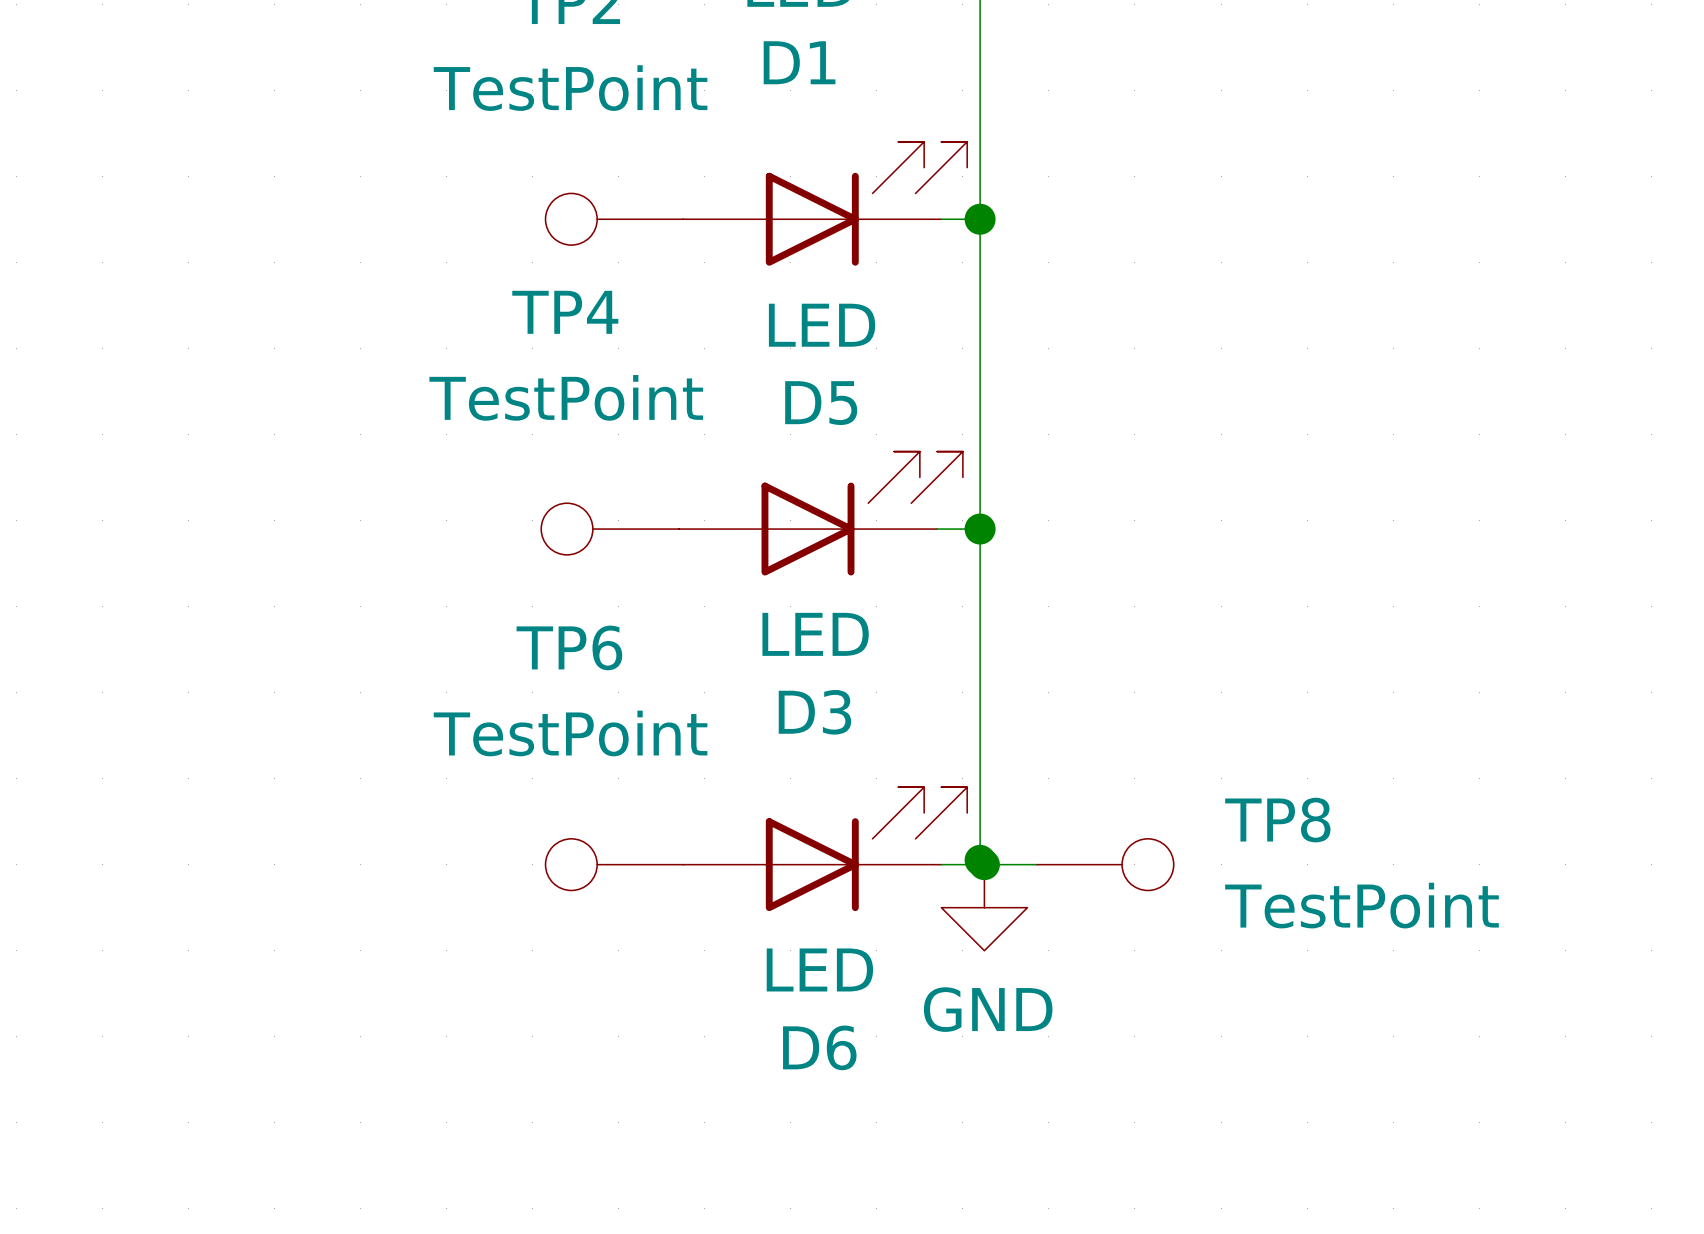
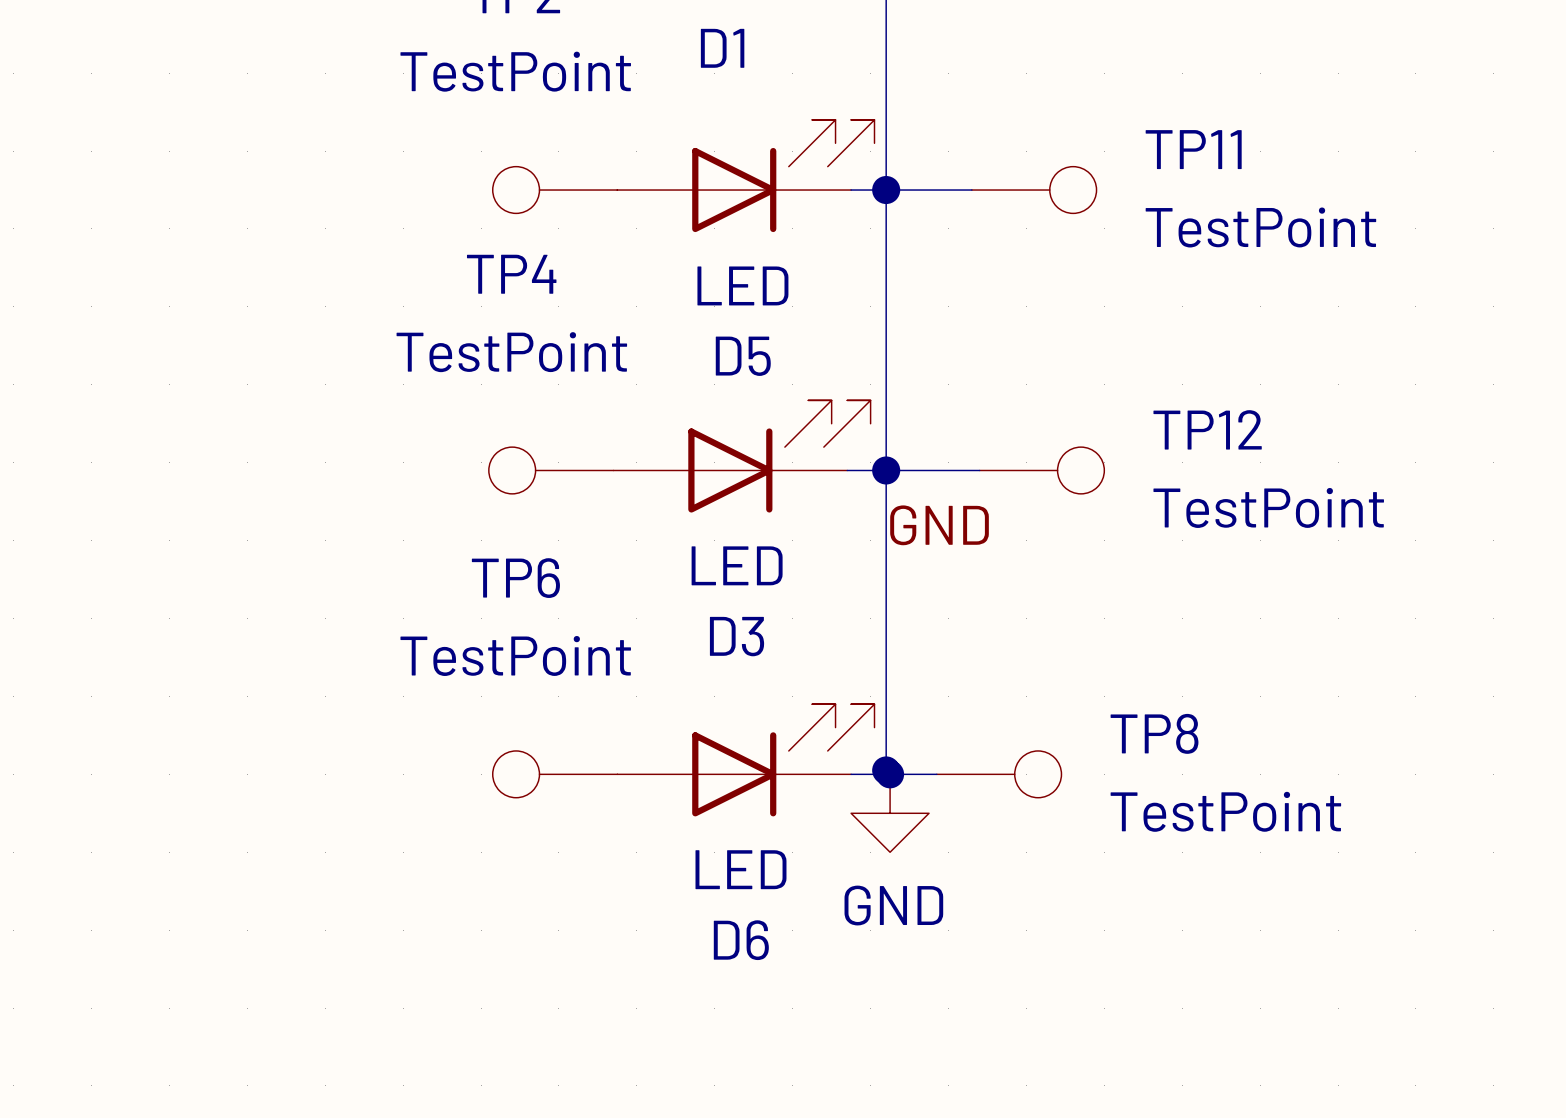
wire: none -> (886, 190) (971, 190)
TP11: none -> TestPoint (1034, 190)
wire: none -> (886, 470) (979, 470)
TP12: none -> TestPoint (1042, 470)
label: none -> GND (939, 525)

